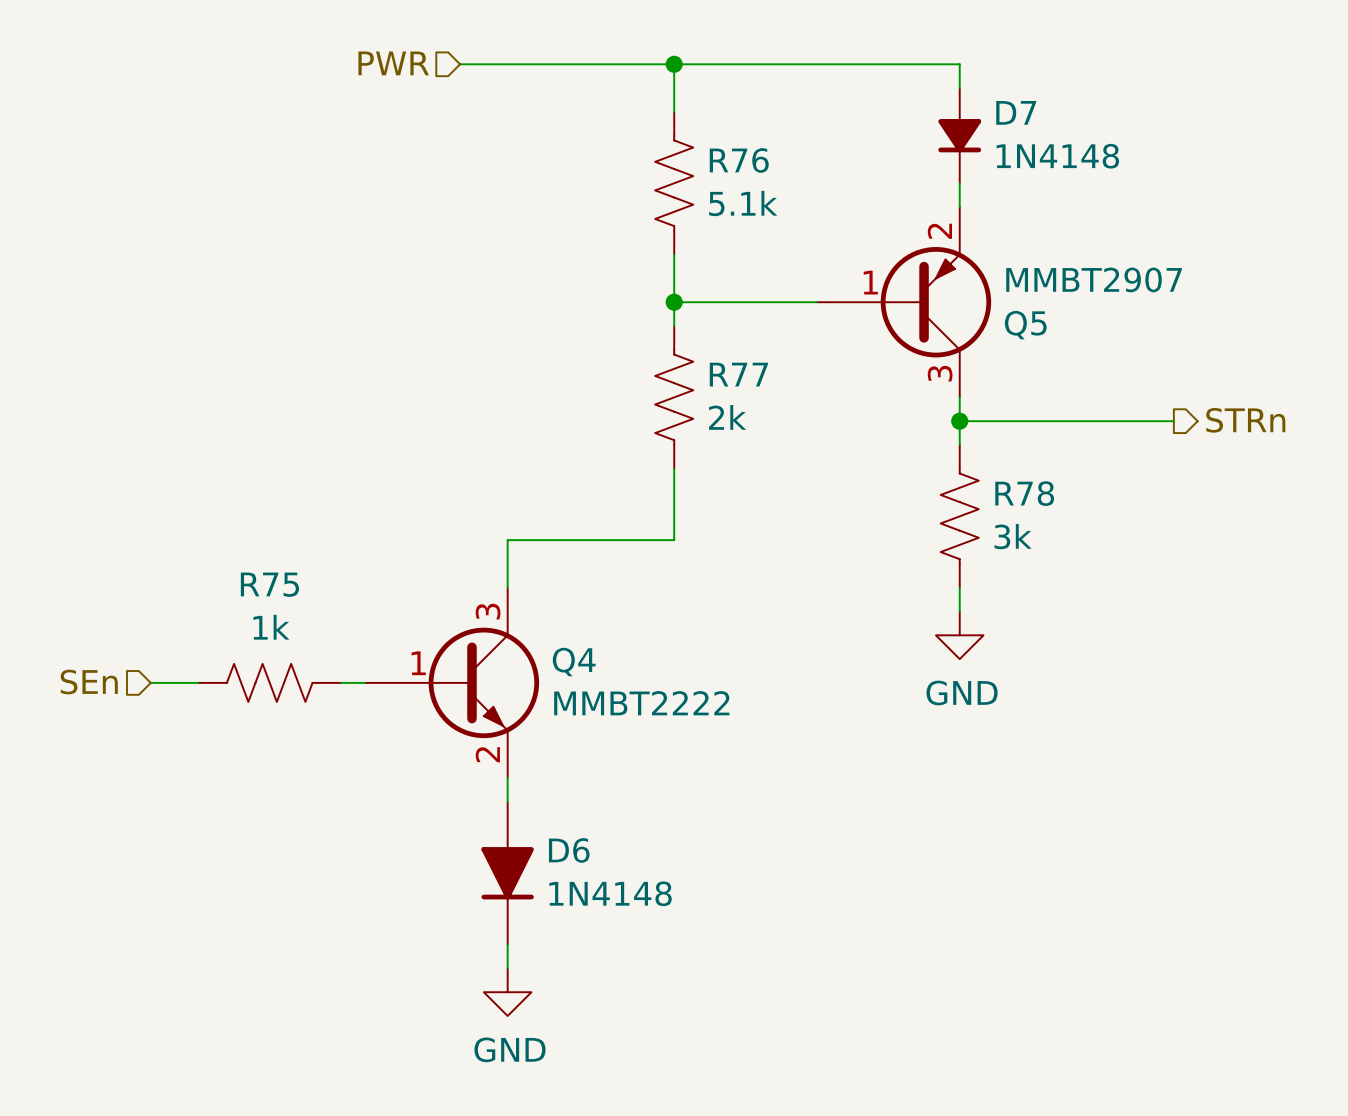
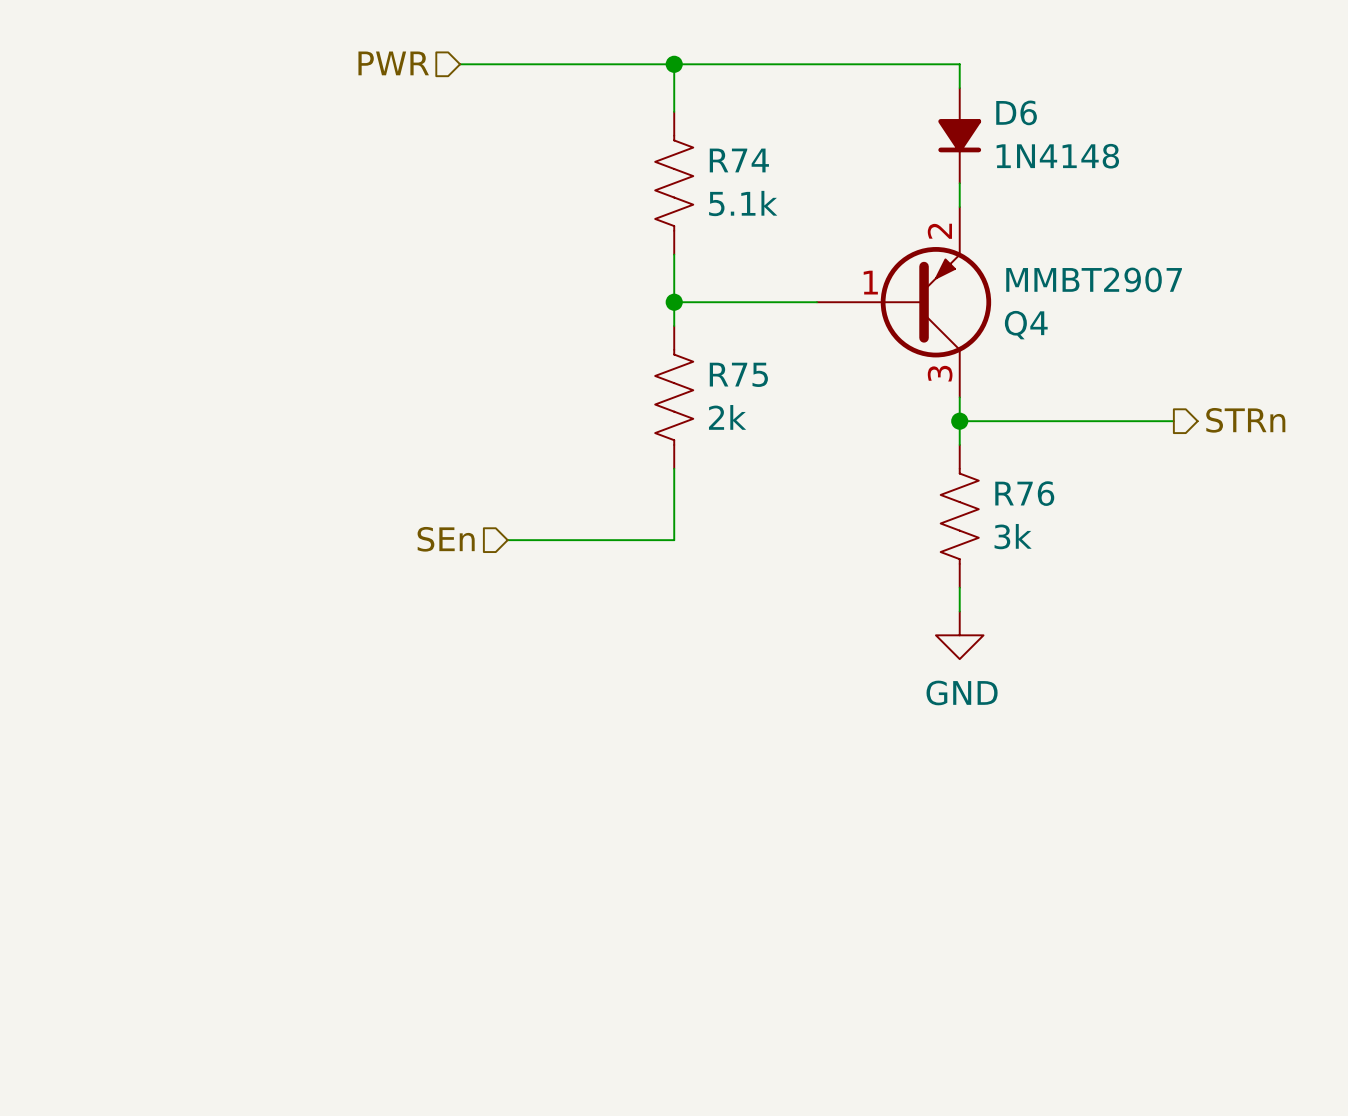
D7 name: D7 (1016, 112) -> D6 (1016, 112)
R76 name: R76 (739, 160) -> R74 (739, 160)
Q5 name: Q5 (1025, 325) -> Q4 (1026, 325)
R77 name: R77 (738, 374) -> R75 (738, 374)
R78 name: R78 (1024, 493) -> R76 (1024, 493)
wire: (507, 540) (507, 587) -> none
hierarchical label position: SEn (89, 682) -> SEn (446, 539)
wire: (150, 682) (198, 682) -> none
R75: 1k (269, 682) -> none
wire: (341, 682) (364, 682) -> none
Q4: MMBT2222 (451, 682) -> none
wire: (507, 778) (507, 801) -> none
D6: 1N4148 (507, 873) -> none
wire: (507, 944) (507, 968) -> none
power symbol: GND (507, 992) -> none

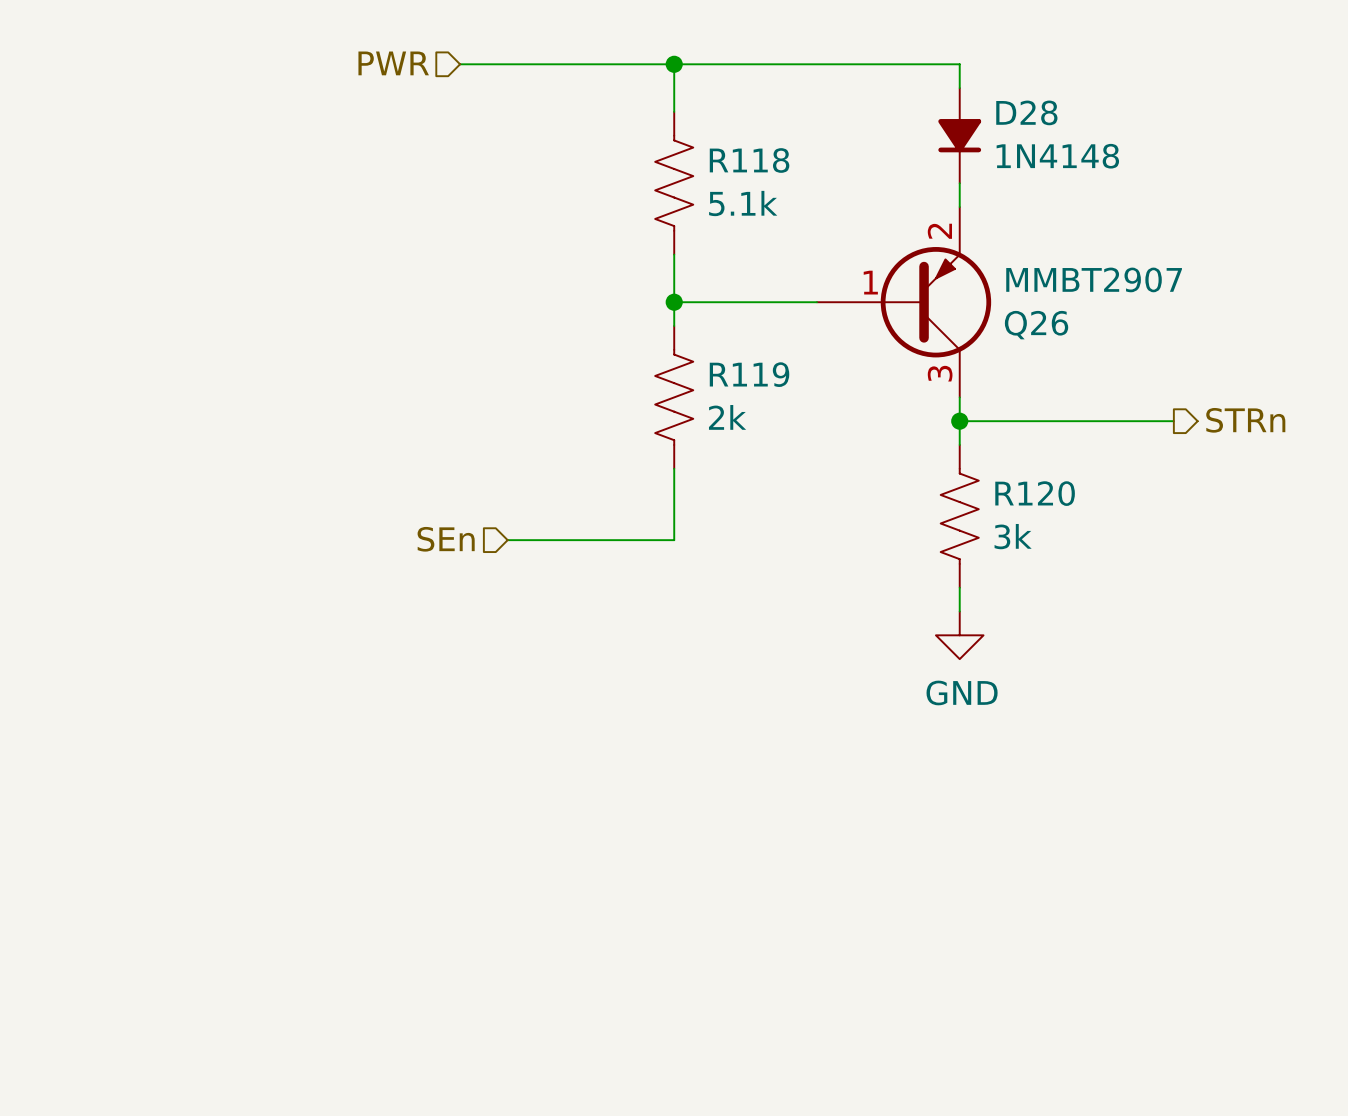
D6 name: D6 (1016, 112) -> D28 (1026, 112)
R74 name: R74 (739, 160) -> R118 (749, 160)
Q4 name: Q4 (1026, 325) -> Q26 (1036, 325)
R75 name: R75 (738, 374) -> R119 (749, 374)
R76 name: R76 (1024, 493) -> R120 (1035, 493)

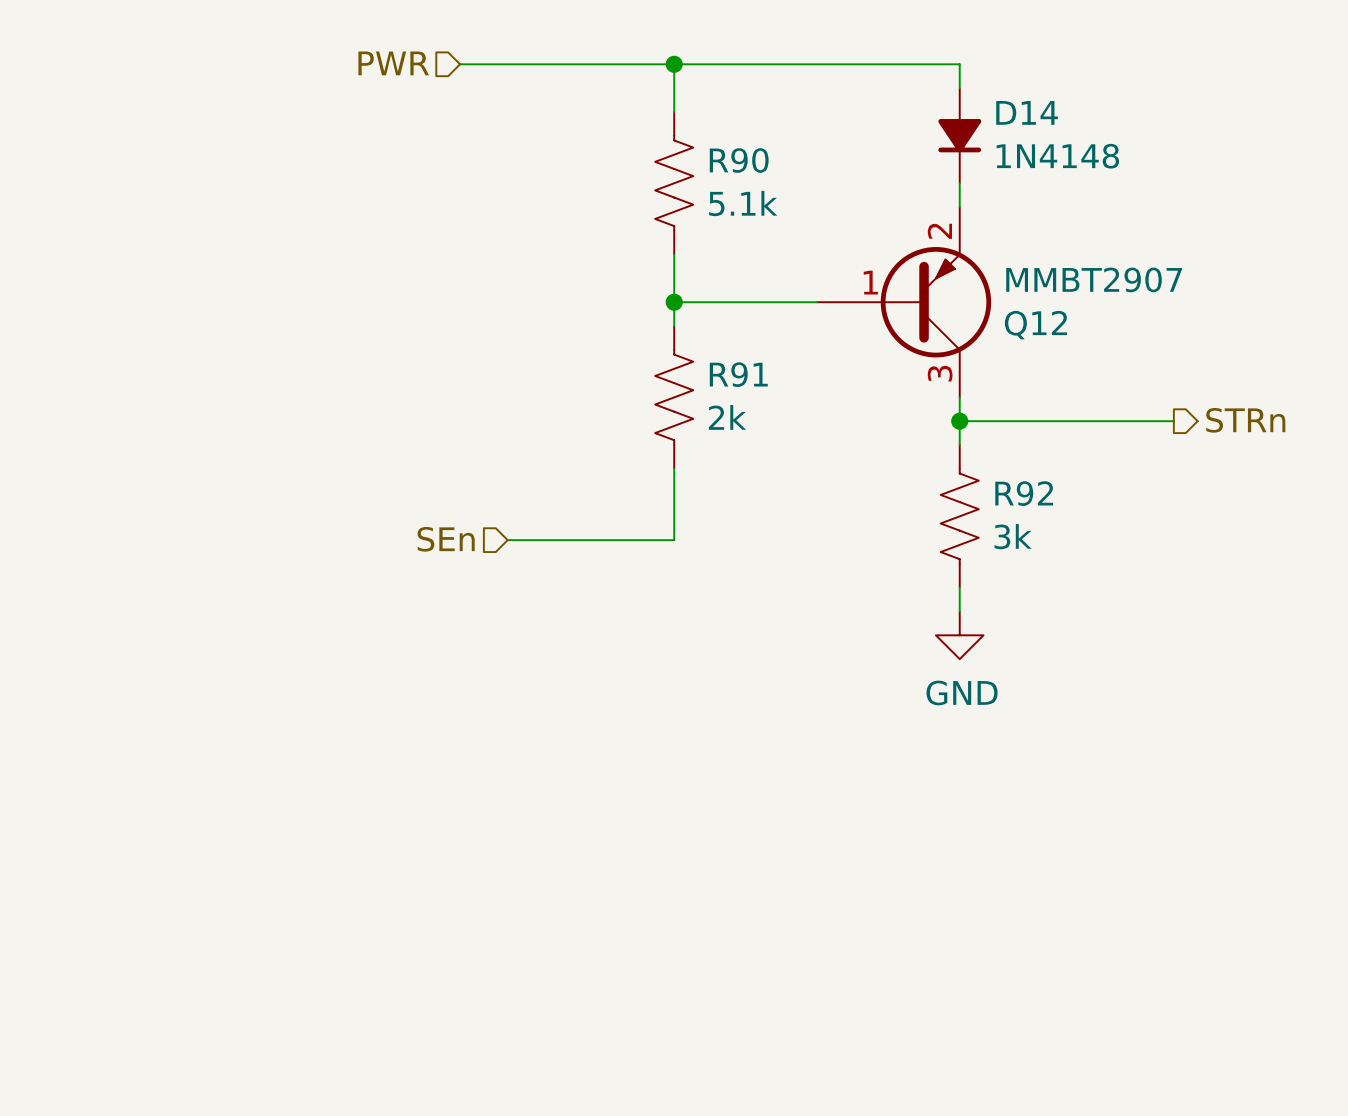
D28 name: D28 (1026, 112) -> D14 (1027, 112)
R118 name: R118 (749, 160) -> R90 (739, 160)
Q26 name: Q26 (1036, 325) -> Q12 (1035, 325)
R119 name: R119 (749, 374) -> R91 (738, 374)
R120 name: R120 (1035, 493) -> R92 (1024, 493)

